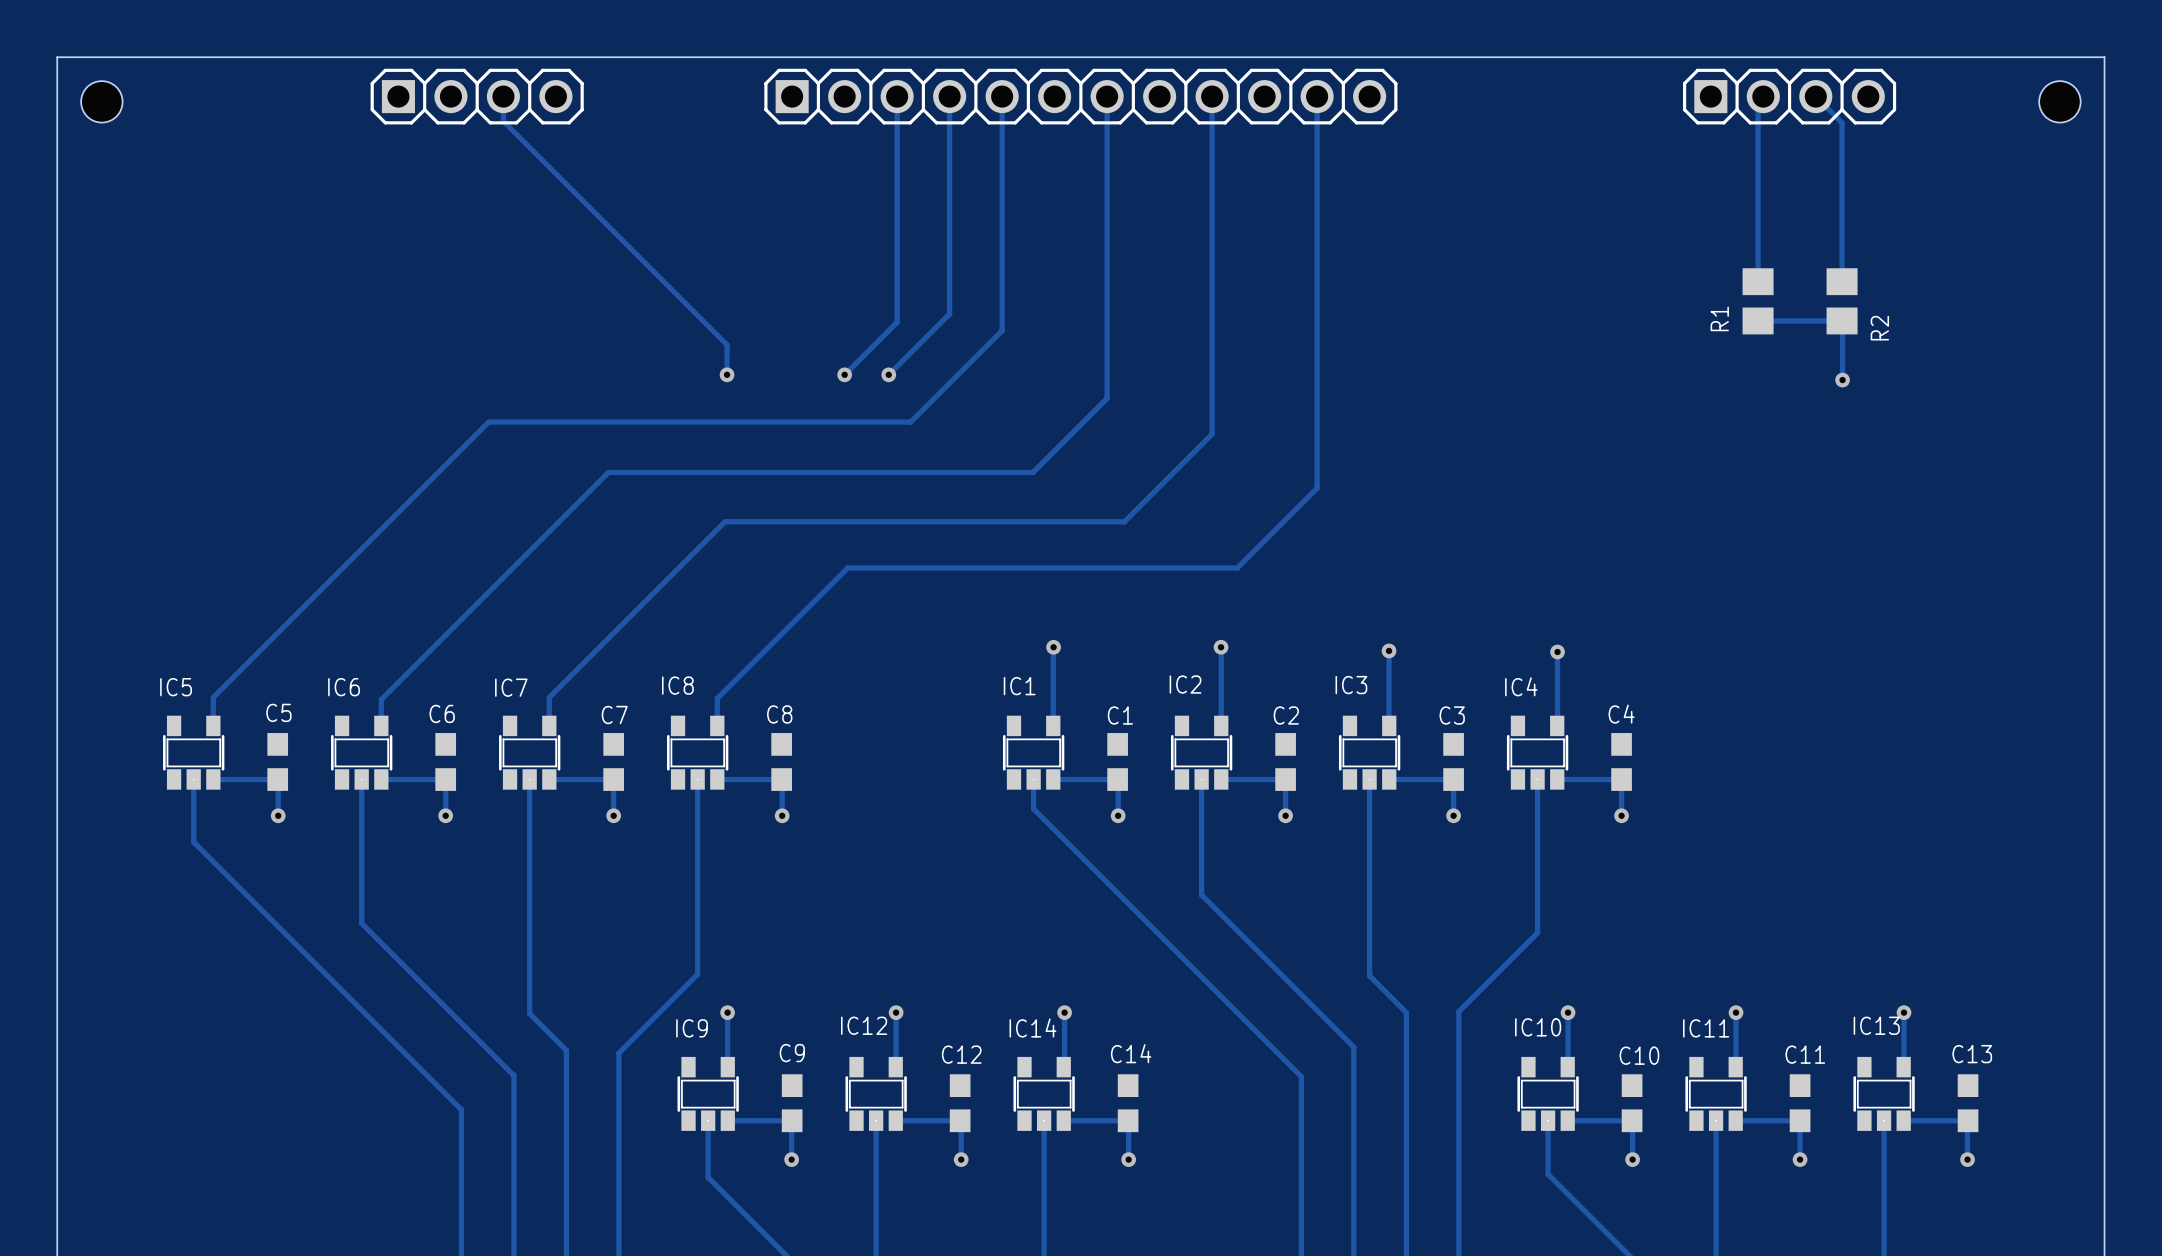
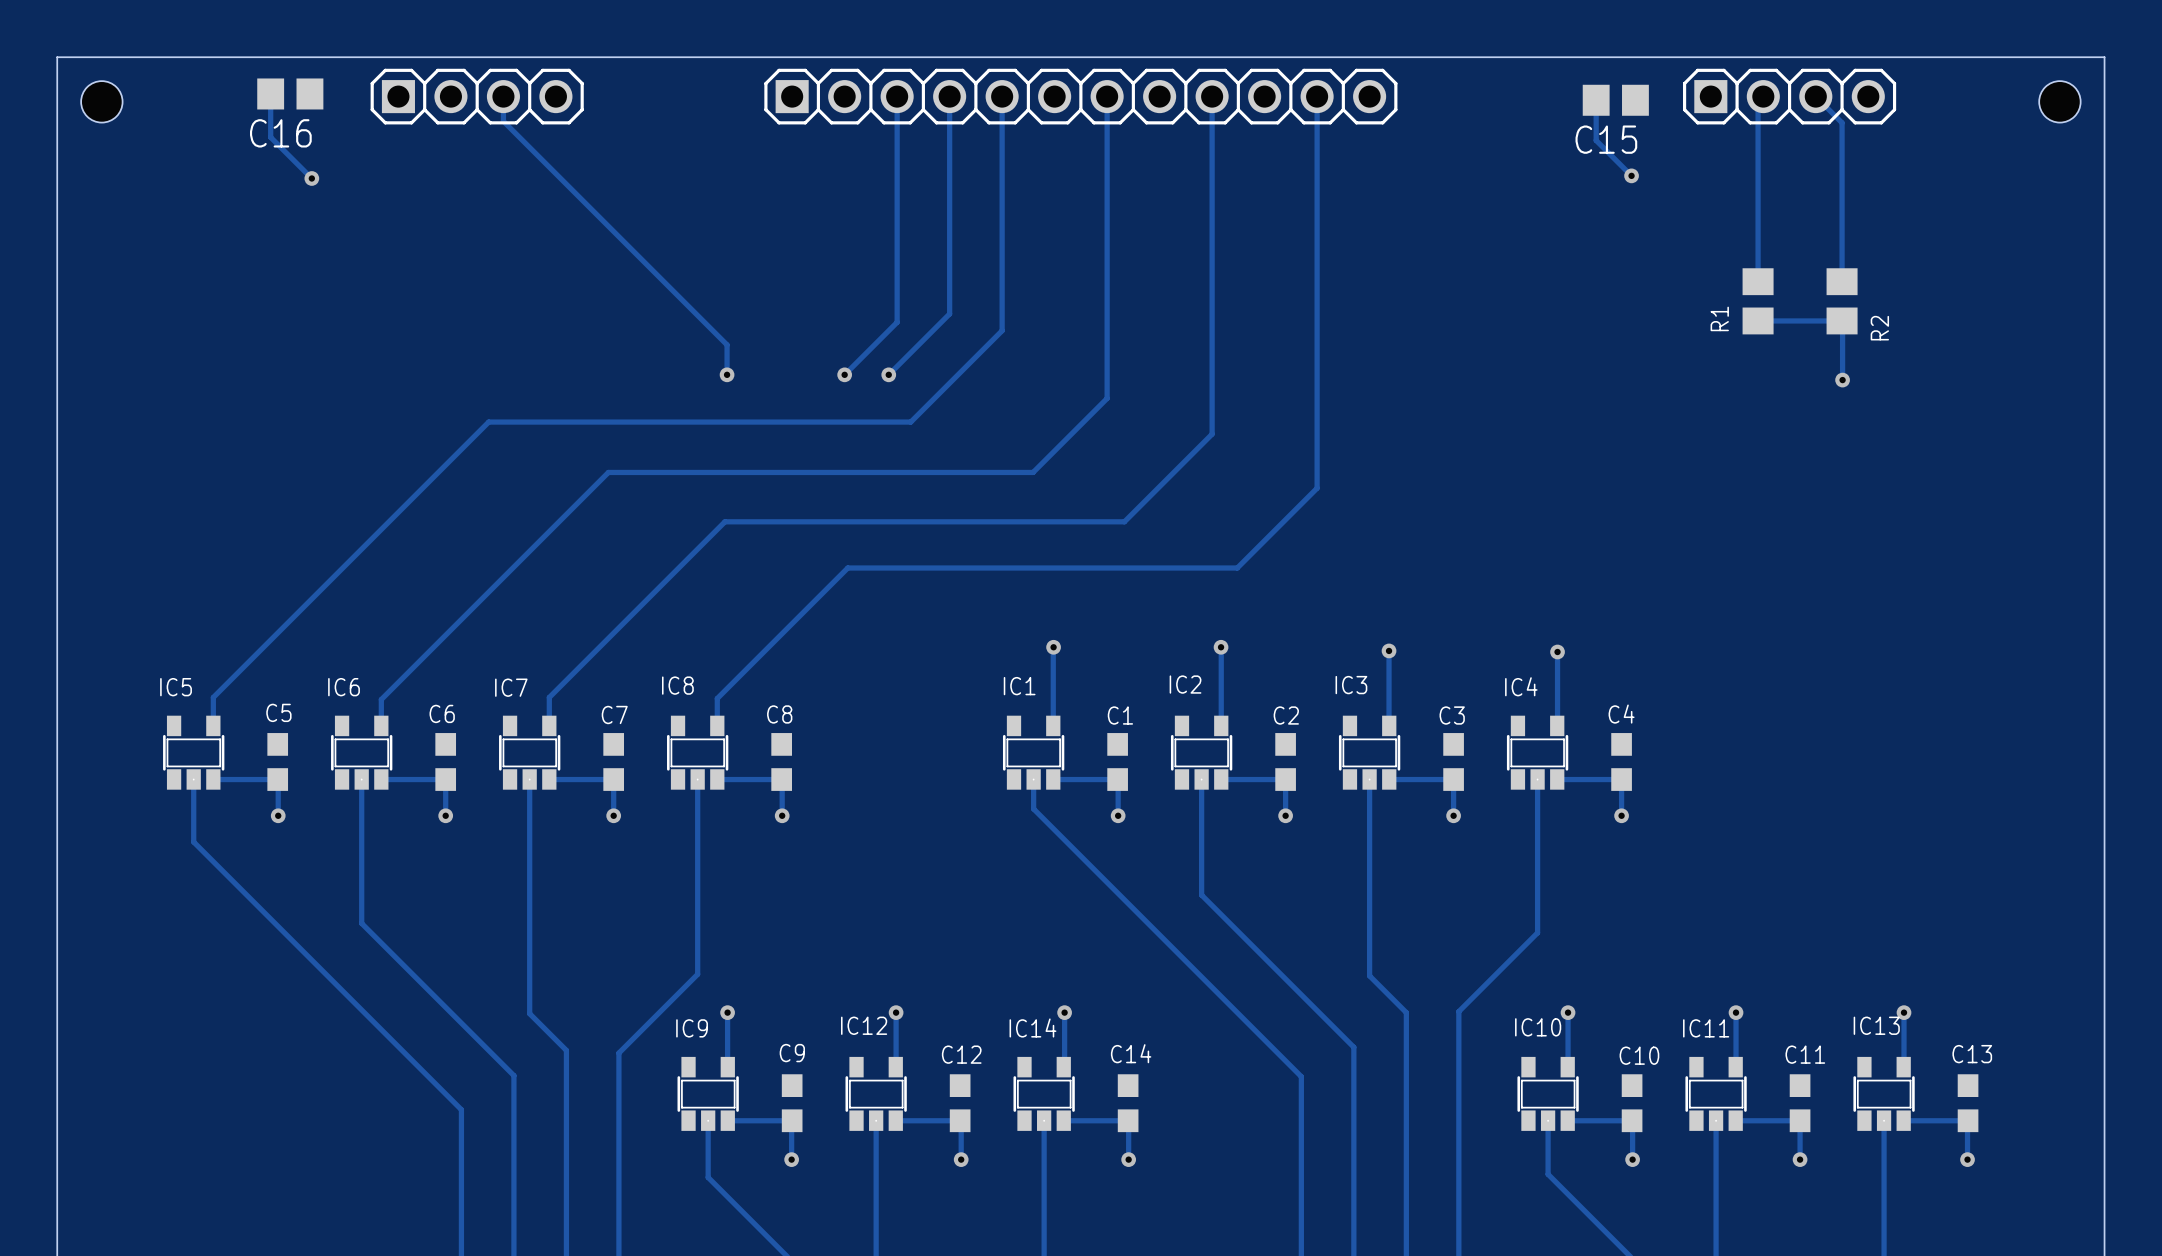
track: none -> (270, 93) (270, 137) (311, 178)
C16: none -> (290, 93)
track: none -> (1596, 100) (1596, 140) (1631, 175)
C15: none -> (1615, 100)
via: none -> (1631, 175)
via: none -> (311, 178)

